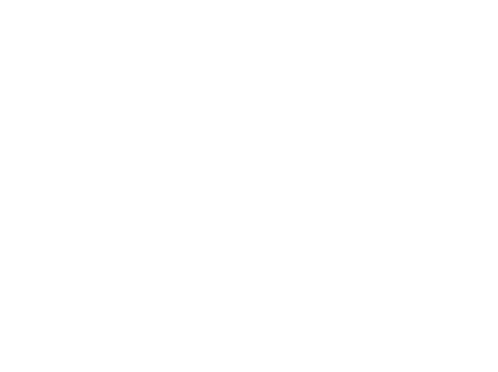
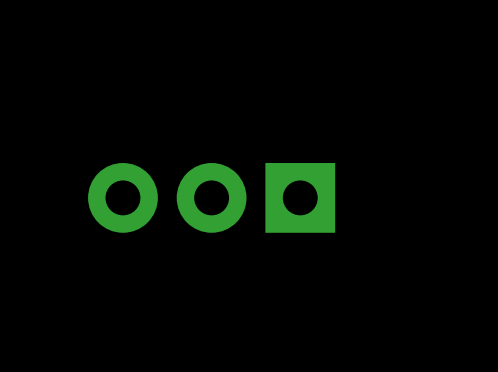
part: none -> (211, 197)

